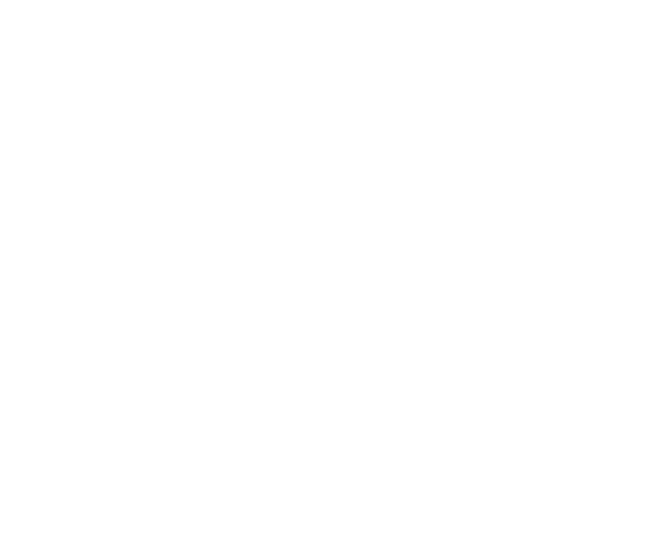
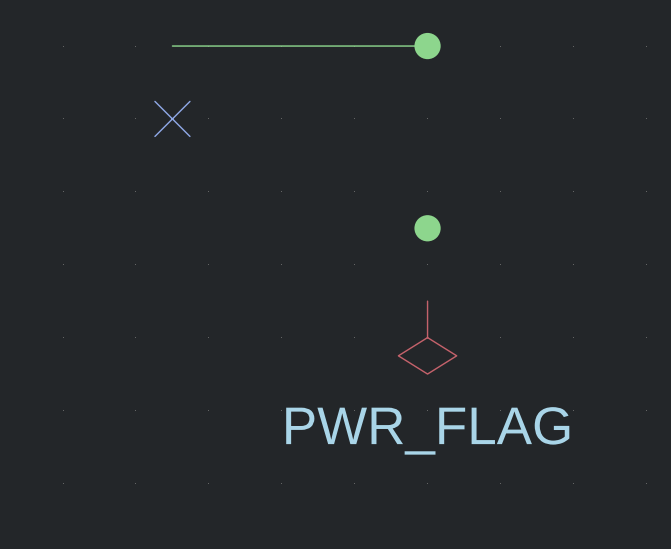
wire: none -> (172, 46) (427, 46)
junction: none -> (427, 46)
no-connect mark: none -> (172, 118)
junction: none -> (427, 228)
power symbol: none -> PWR_FLAG (427, 337)

